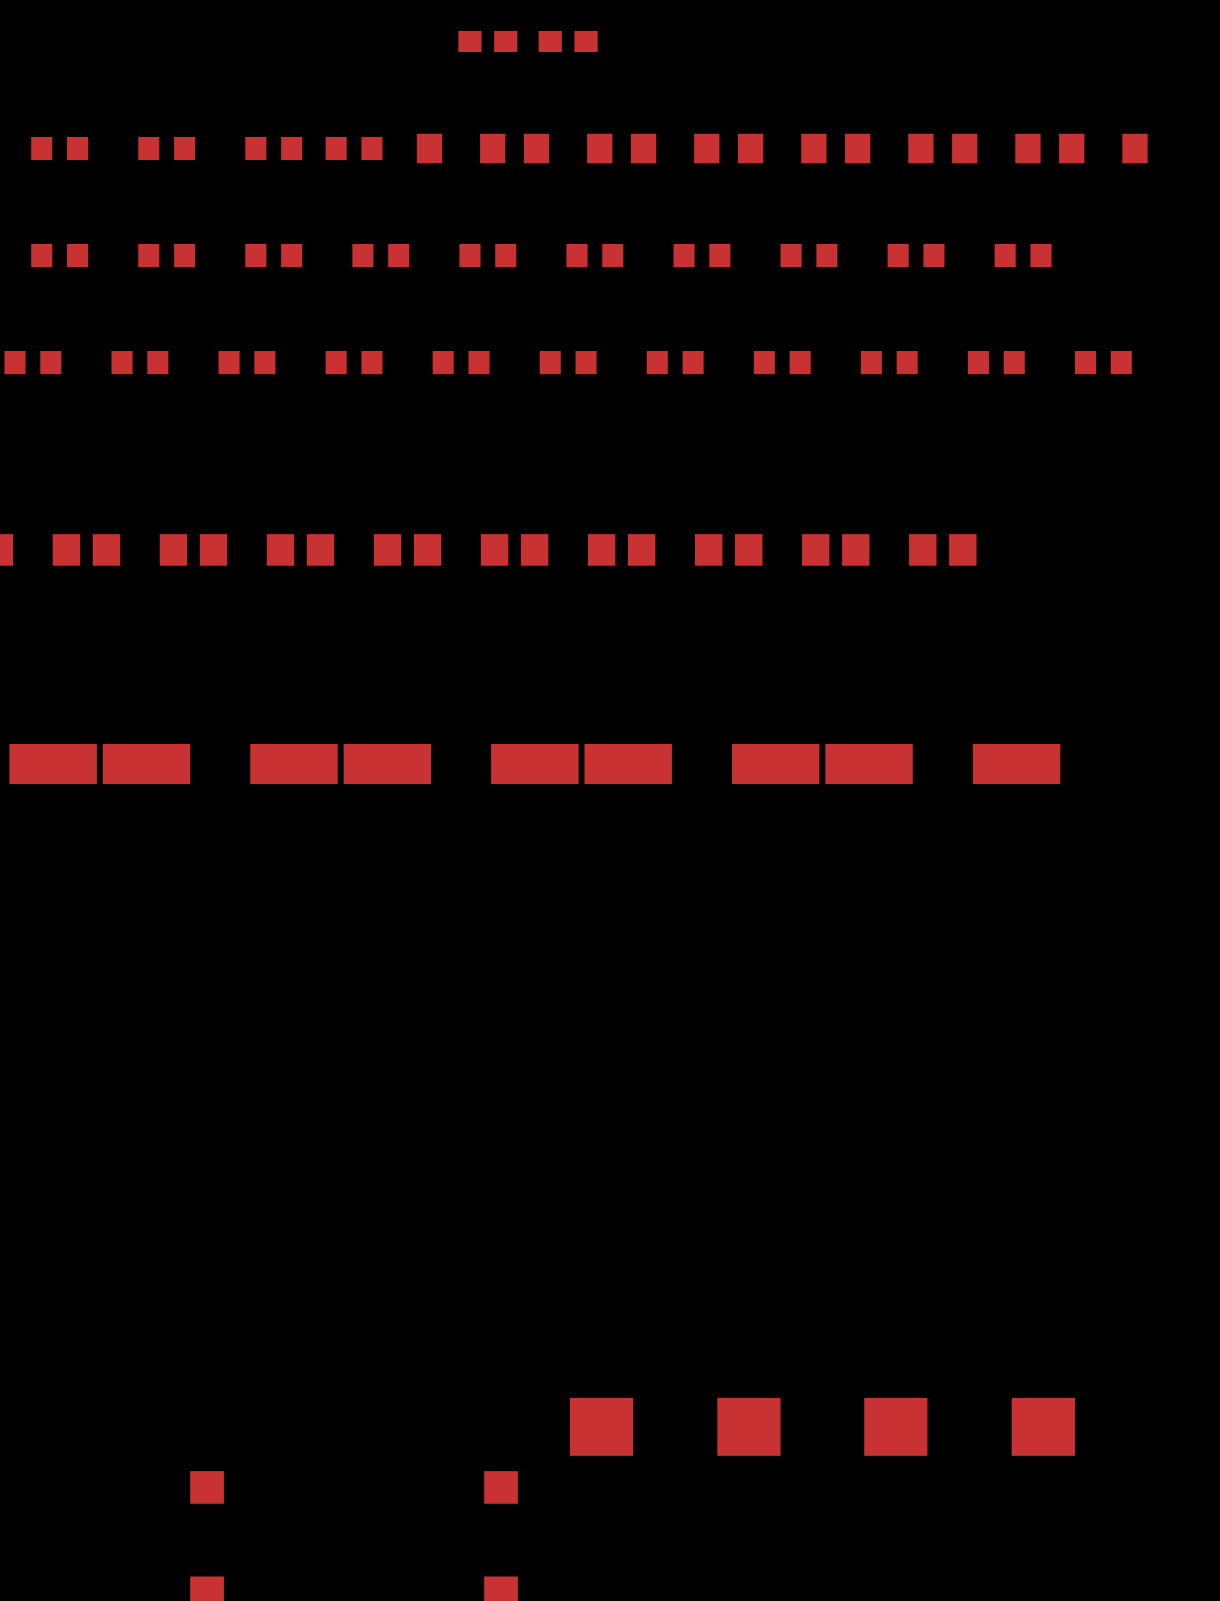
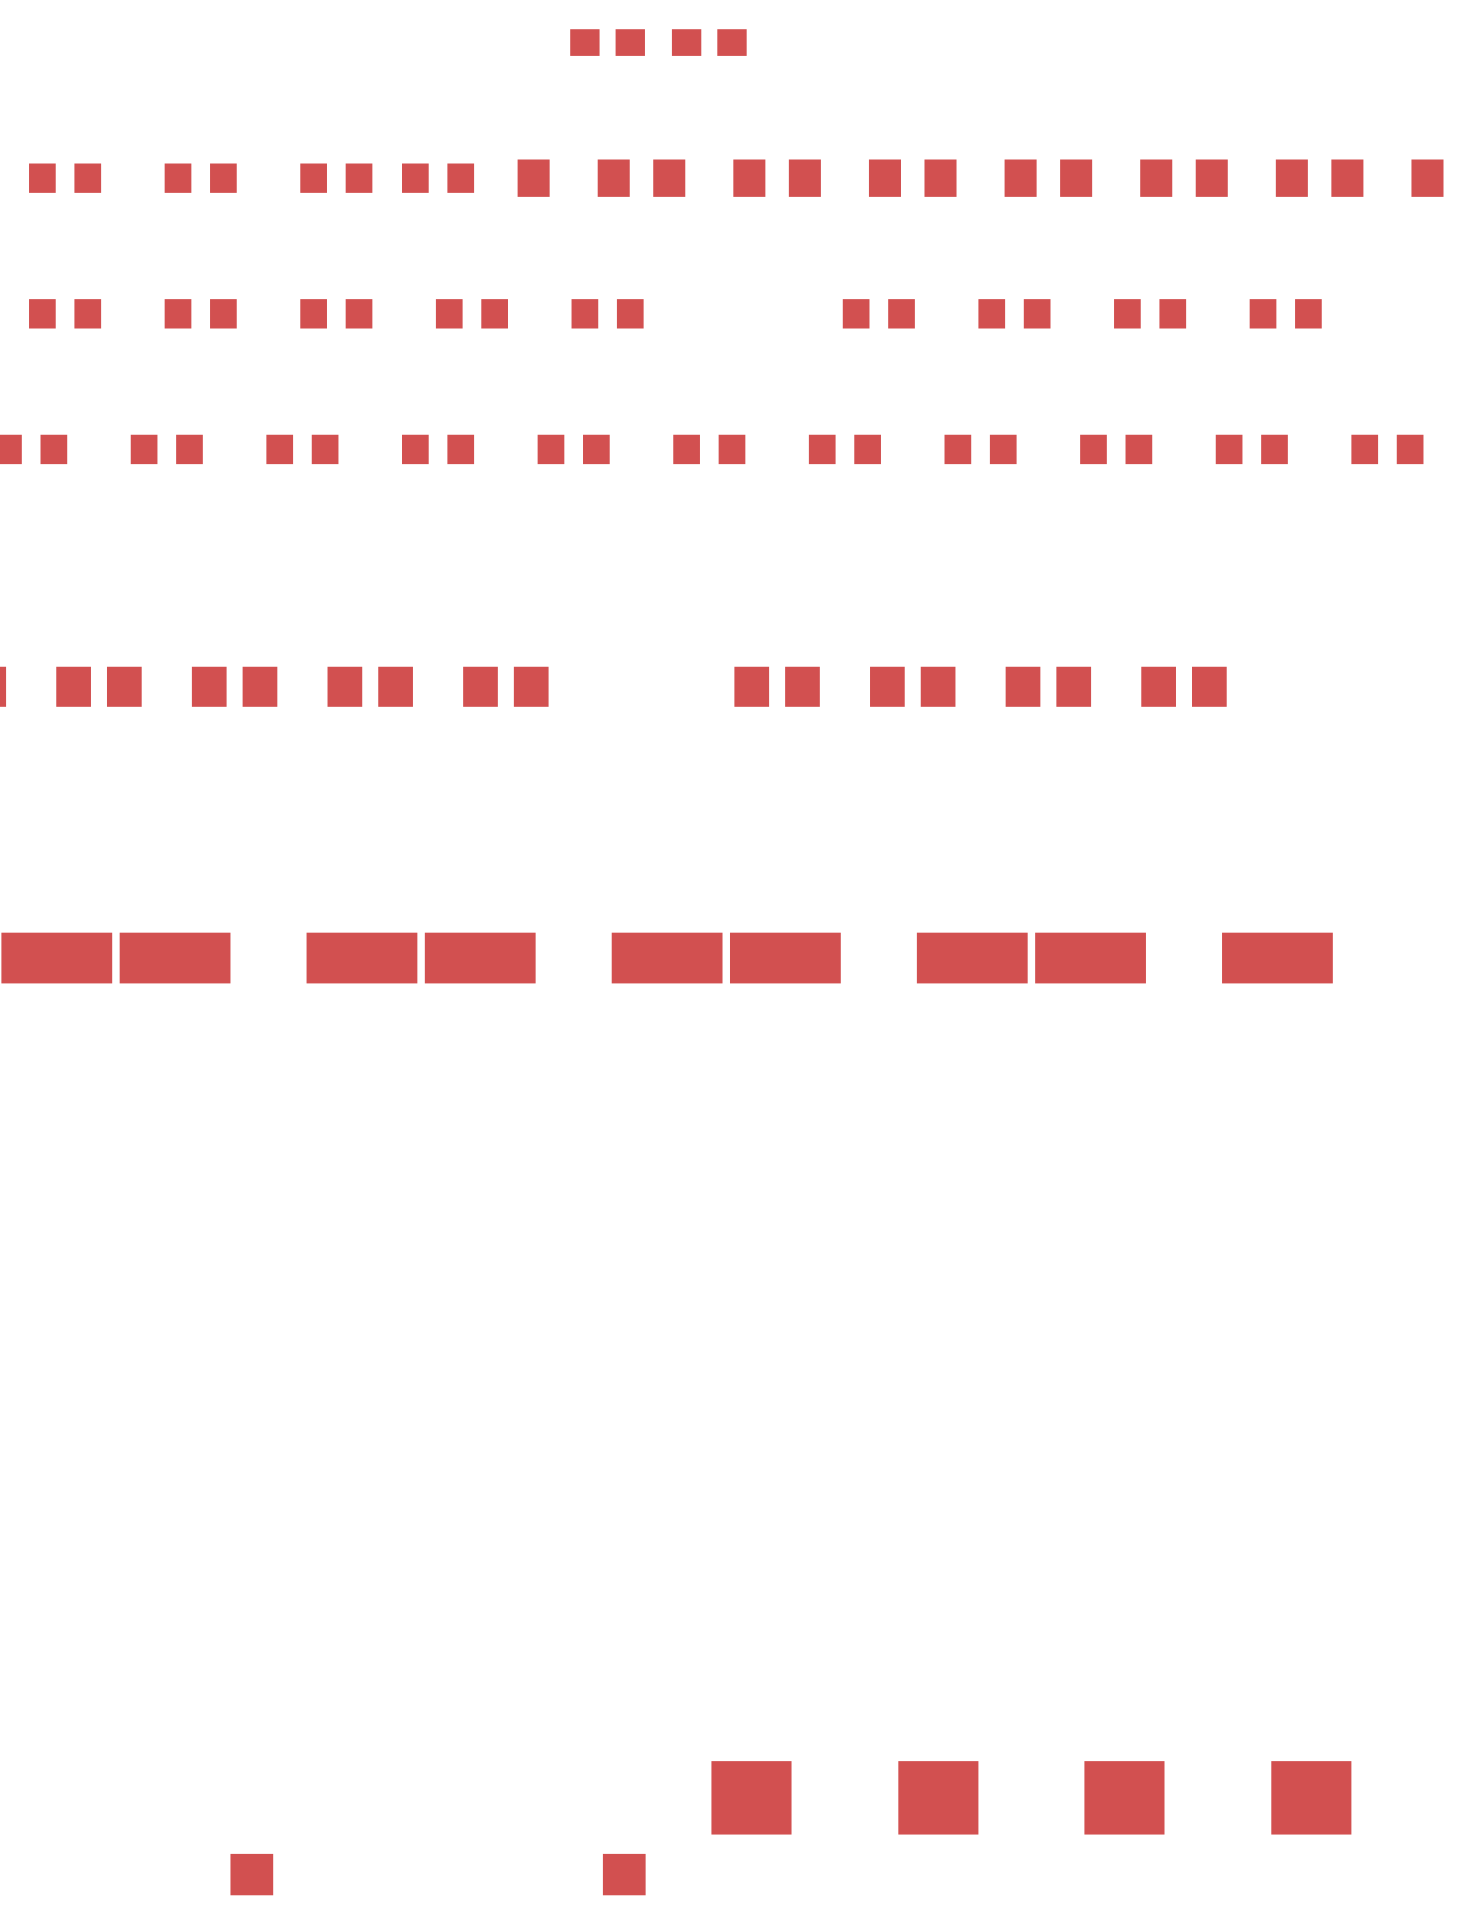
part: (594, 255) -> none
part: (514, 549) -> none

